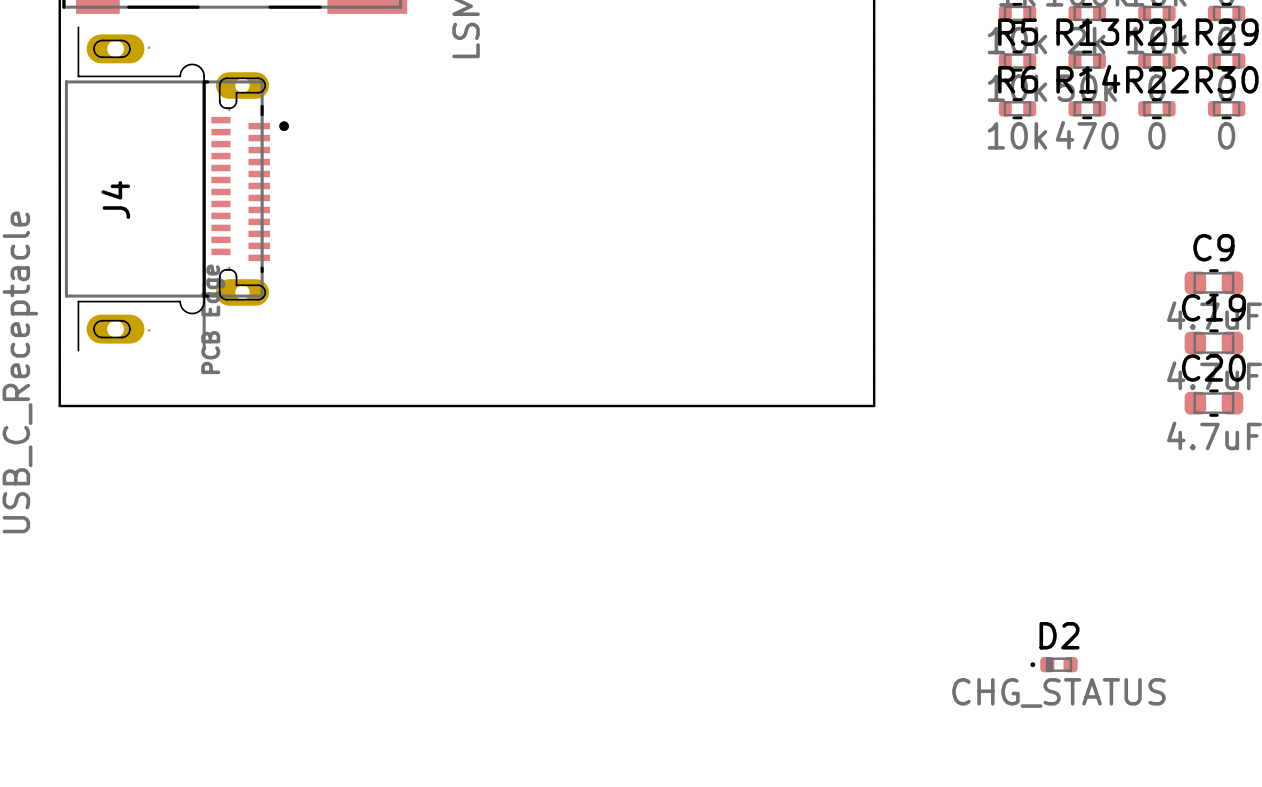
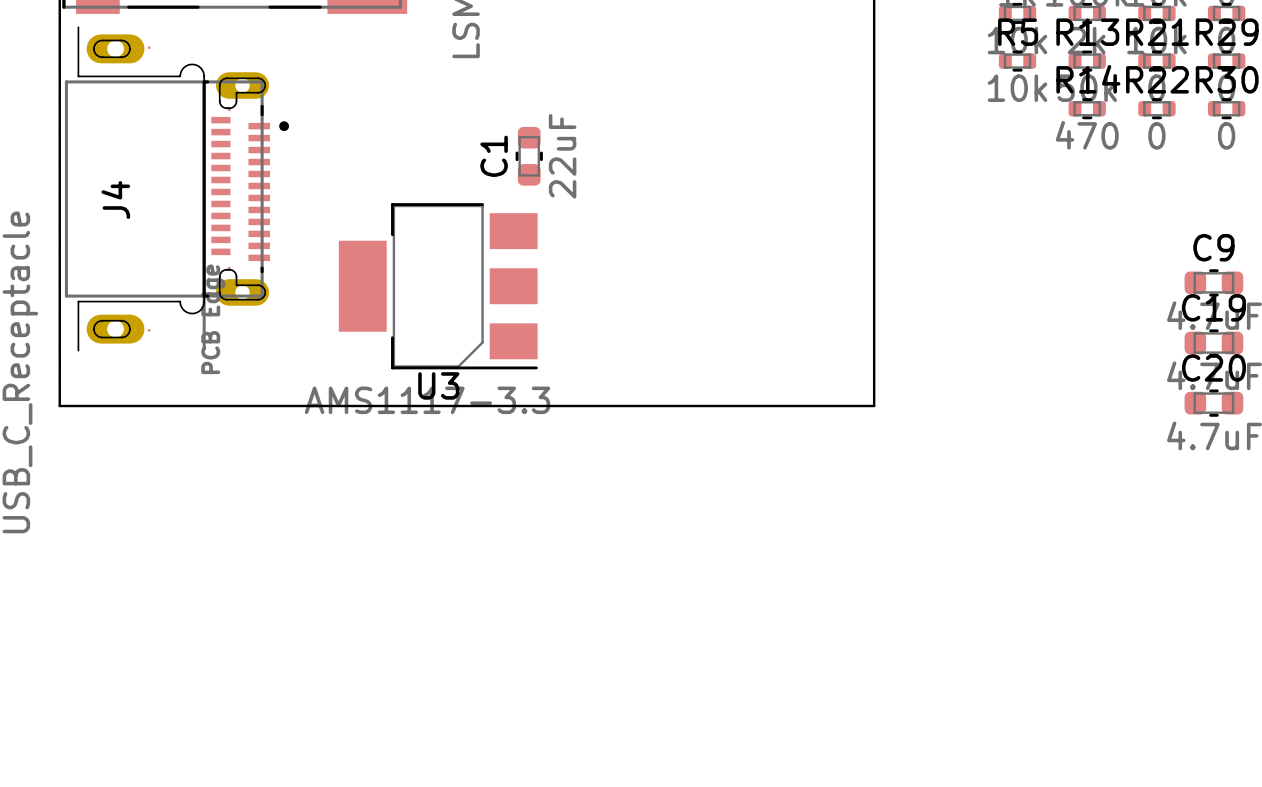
R6: 10k (1017, 108) -> none
C1: none -> 22uF (529, 156)
U3: none -> AMS1117-3.3 (438, 286)
D2: CHG_STATUS (1054, 664) -> none

